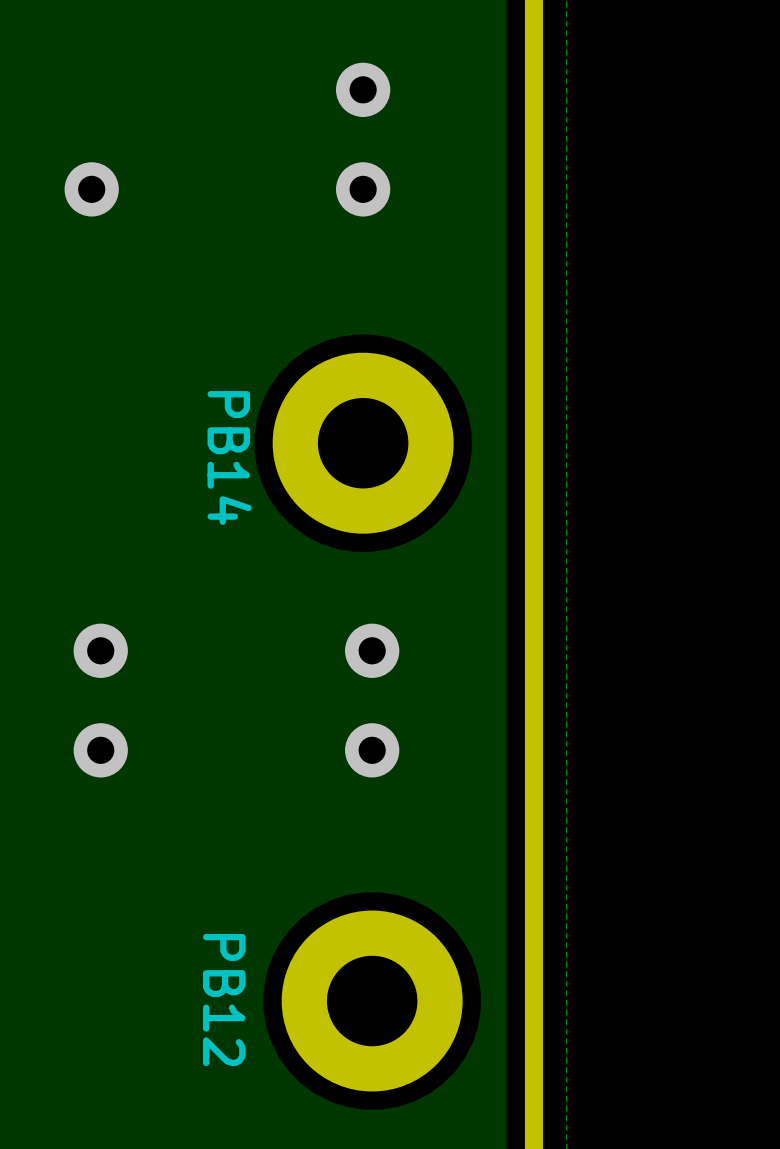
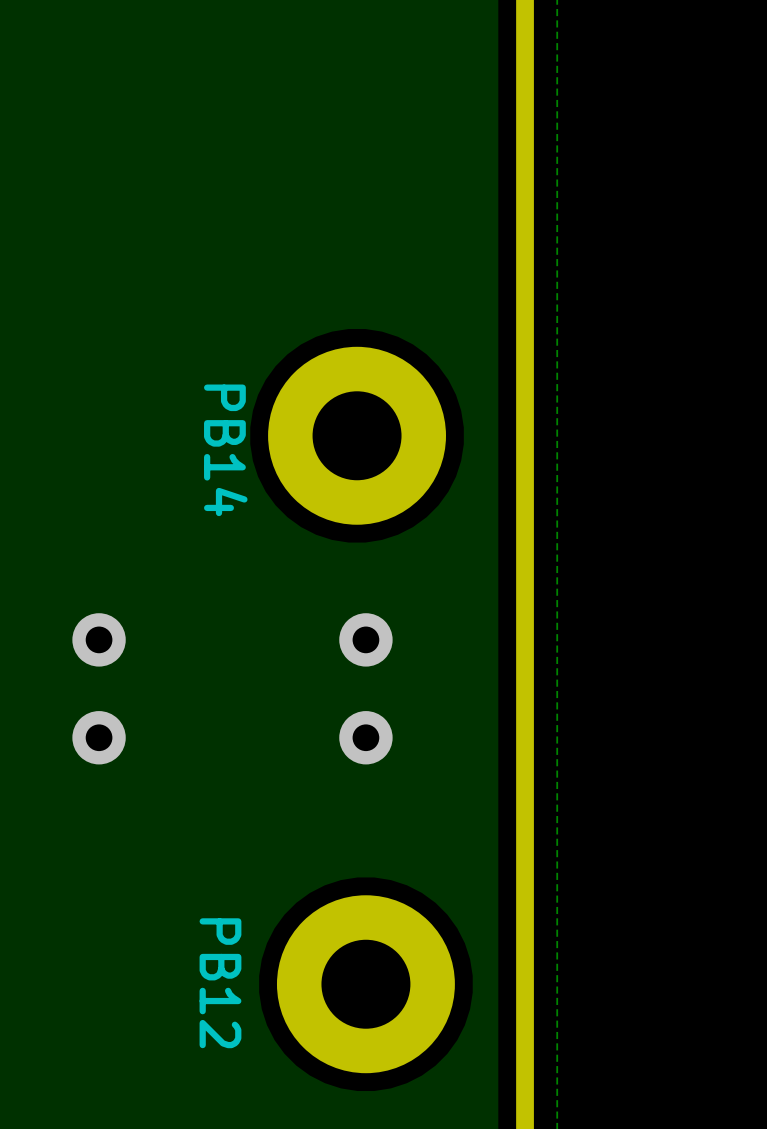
via: (363, 89) -> none
via: (91, 189) -> none
via: (363, 189) -> none

